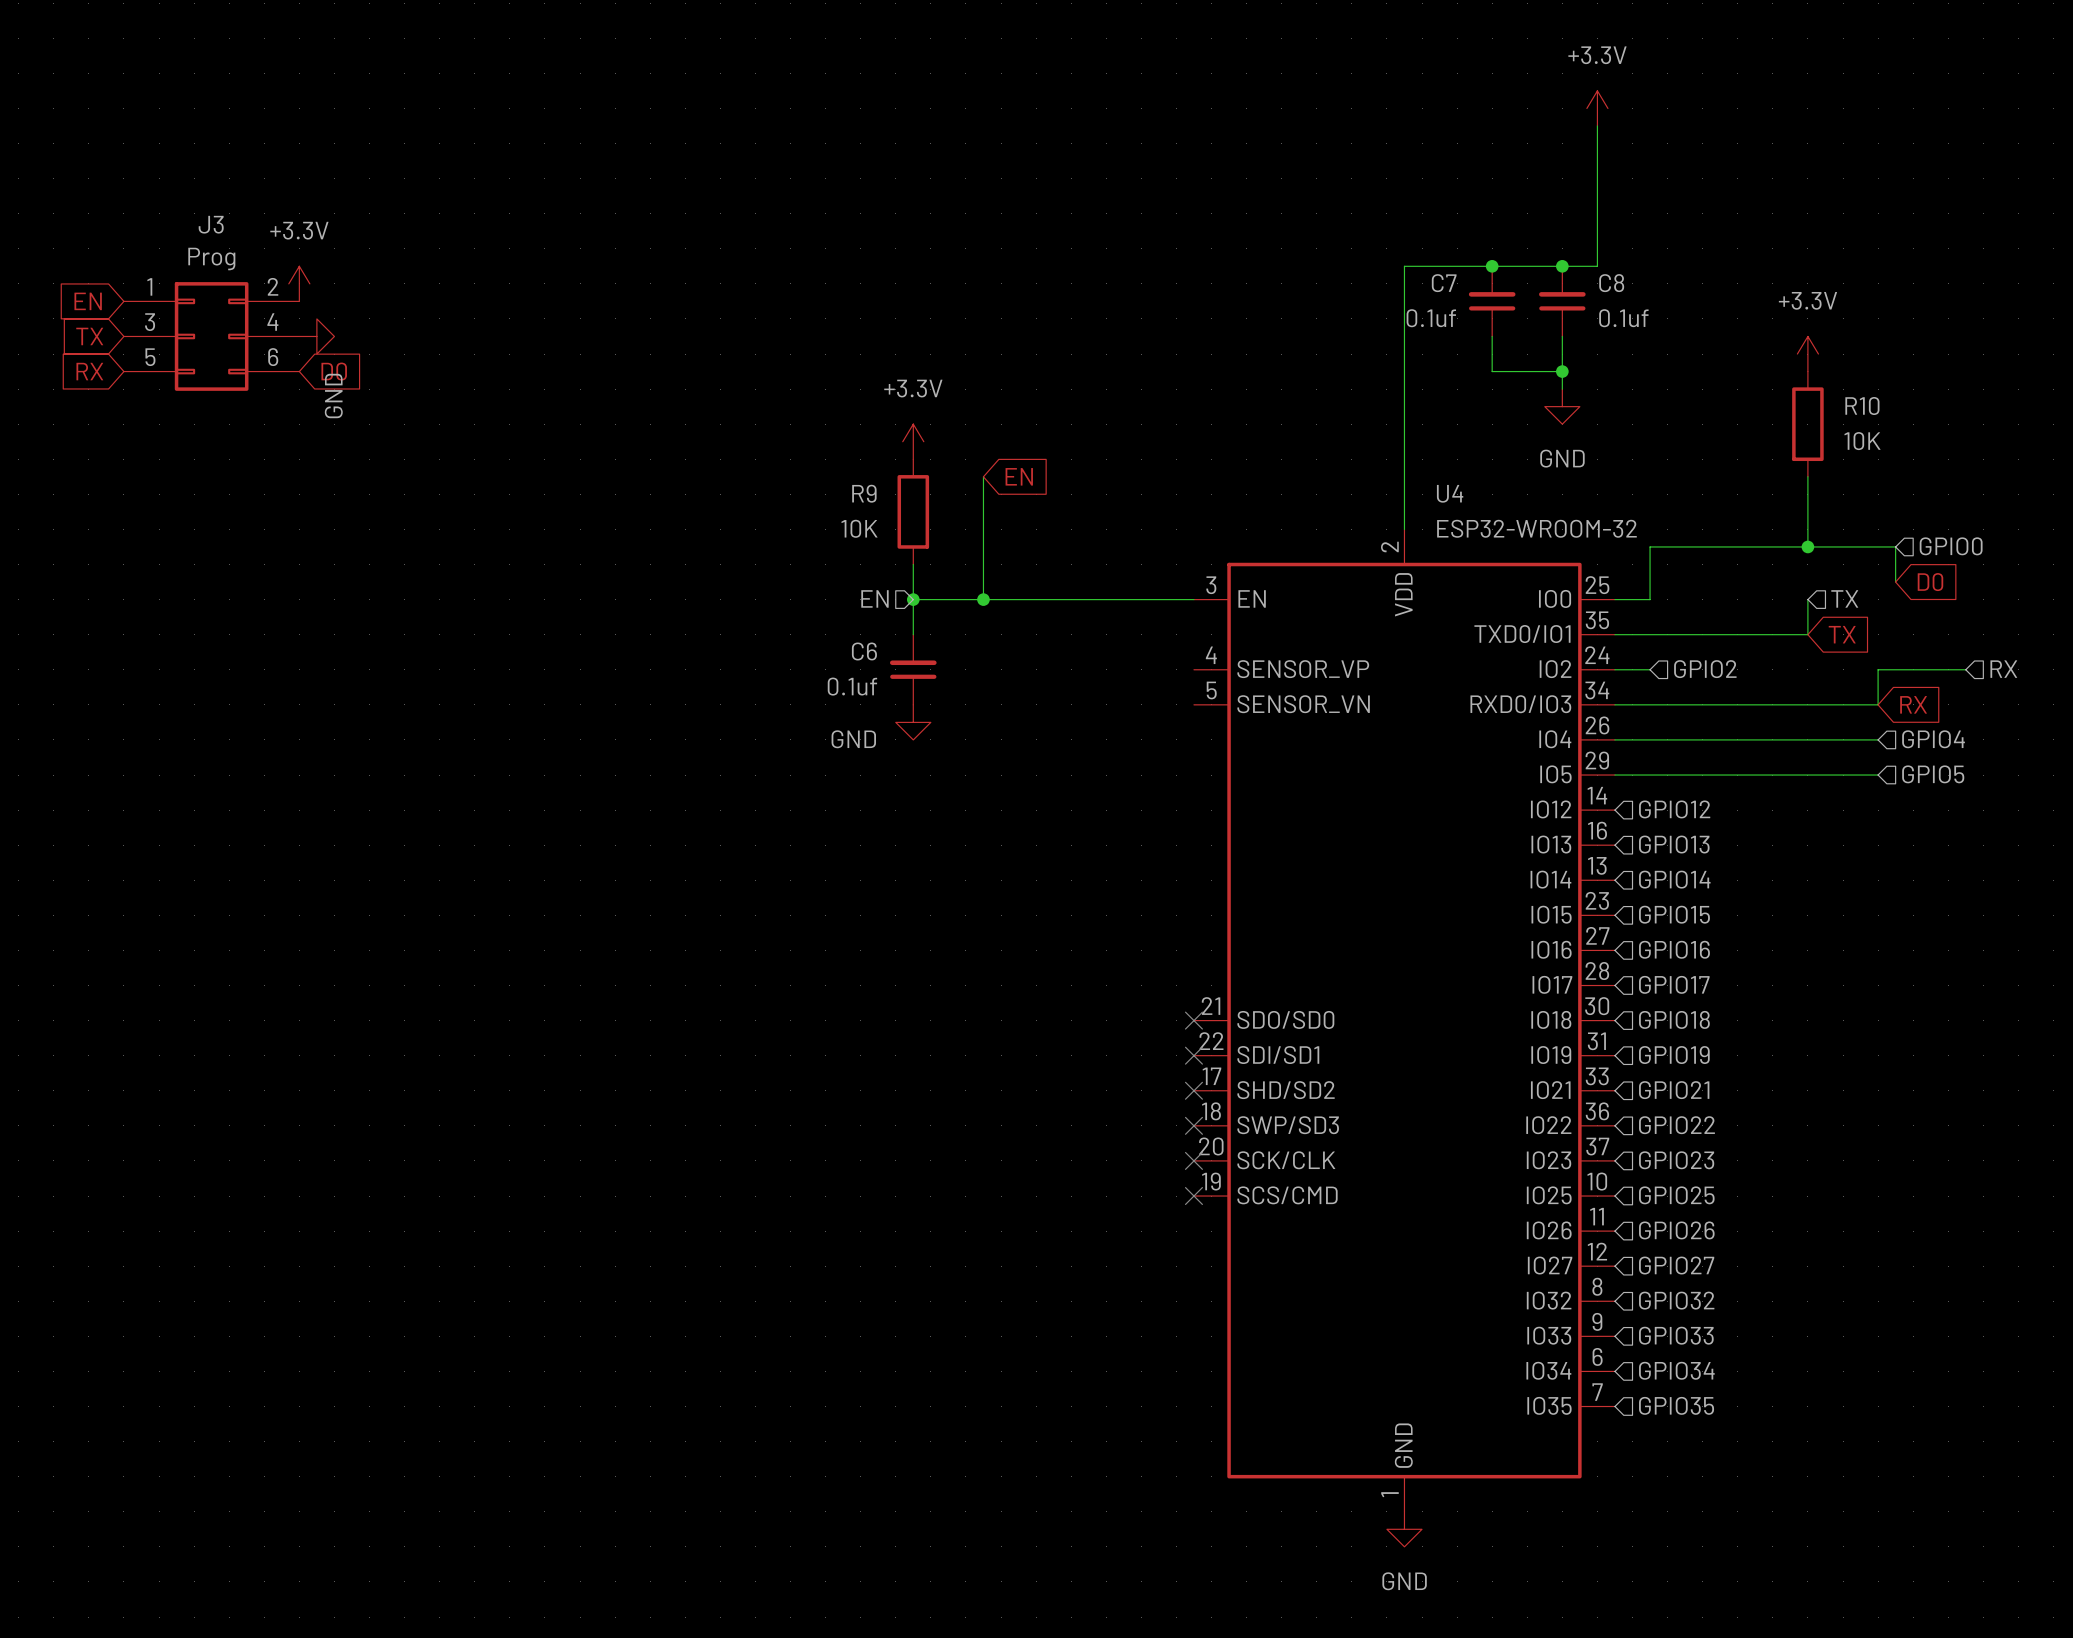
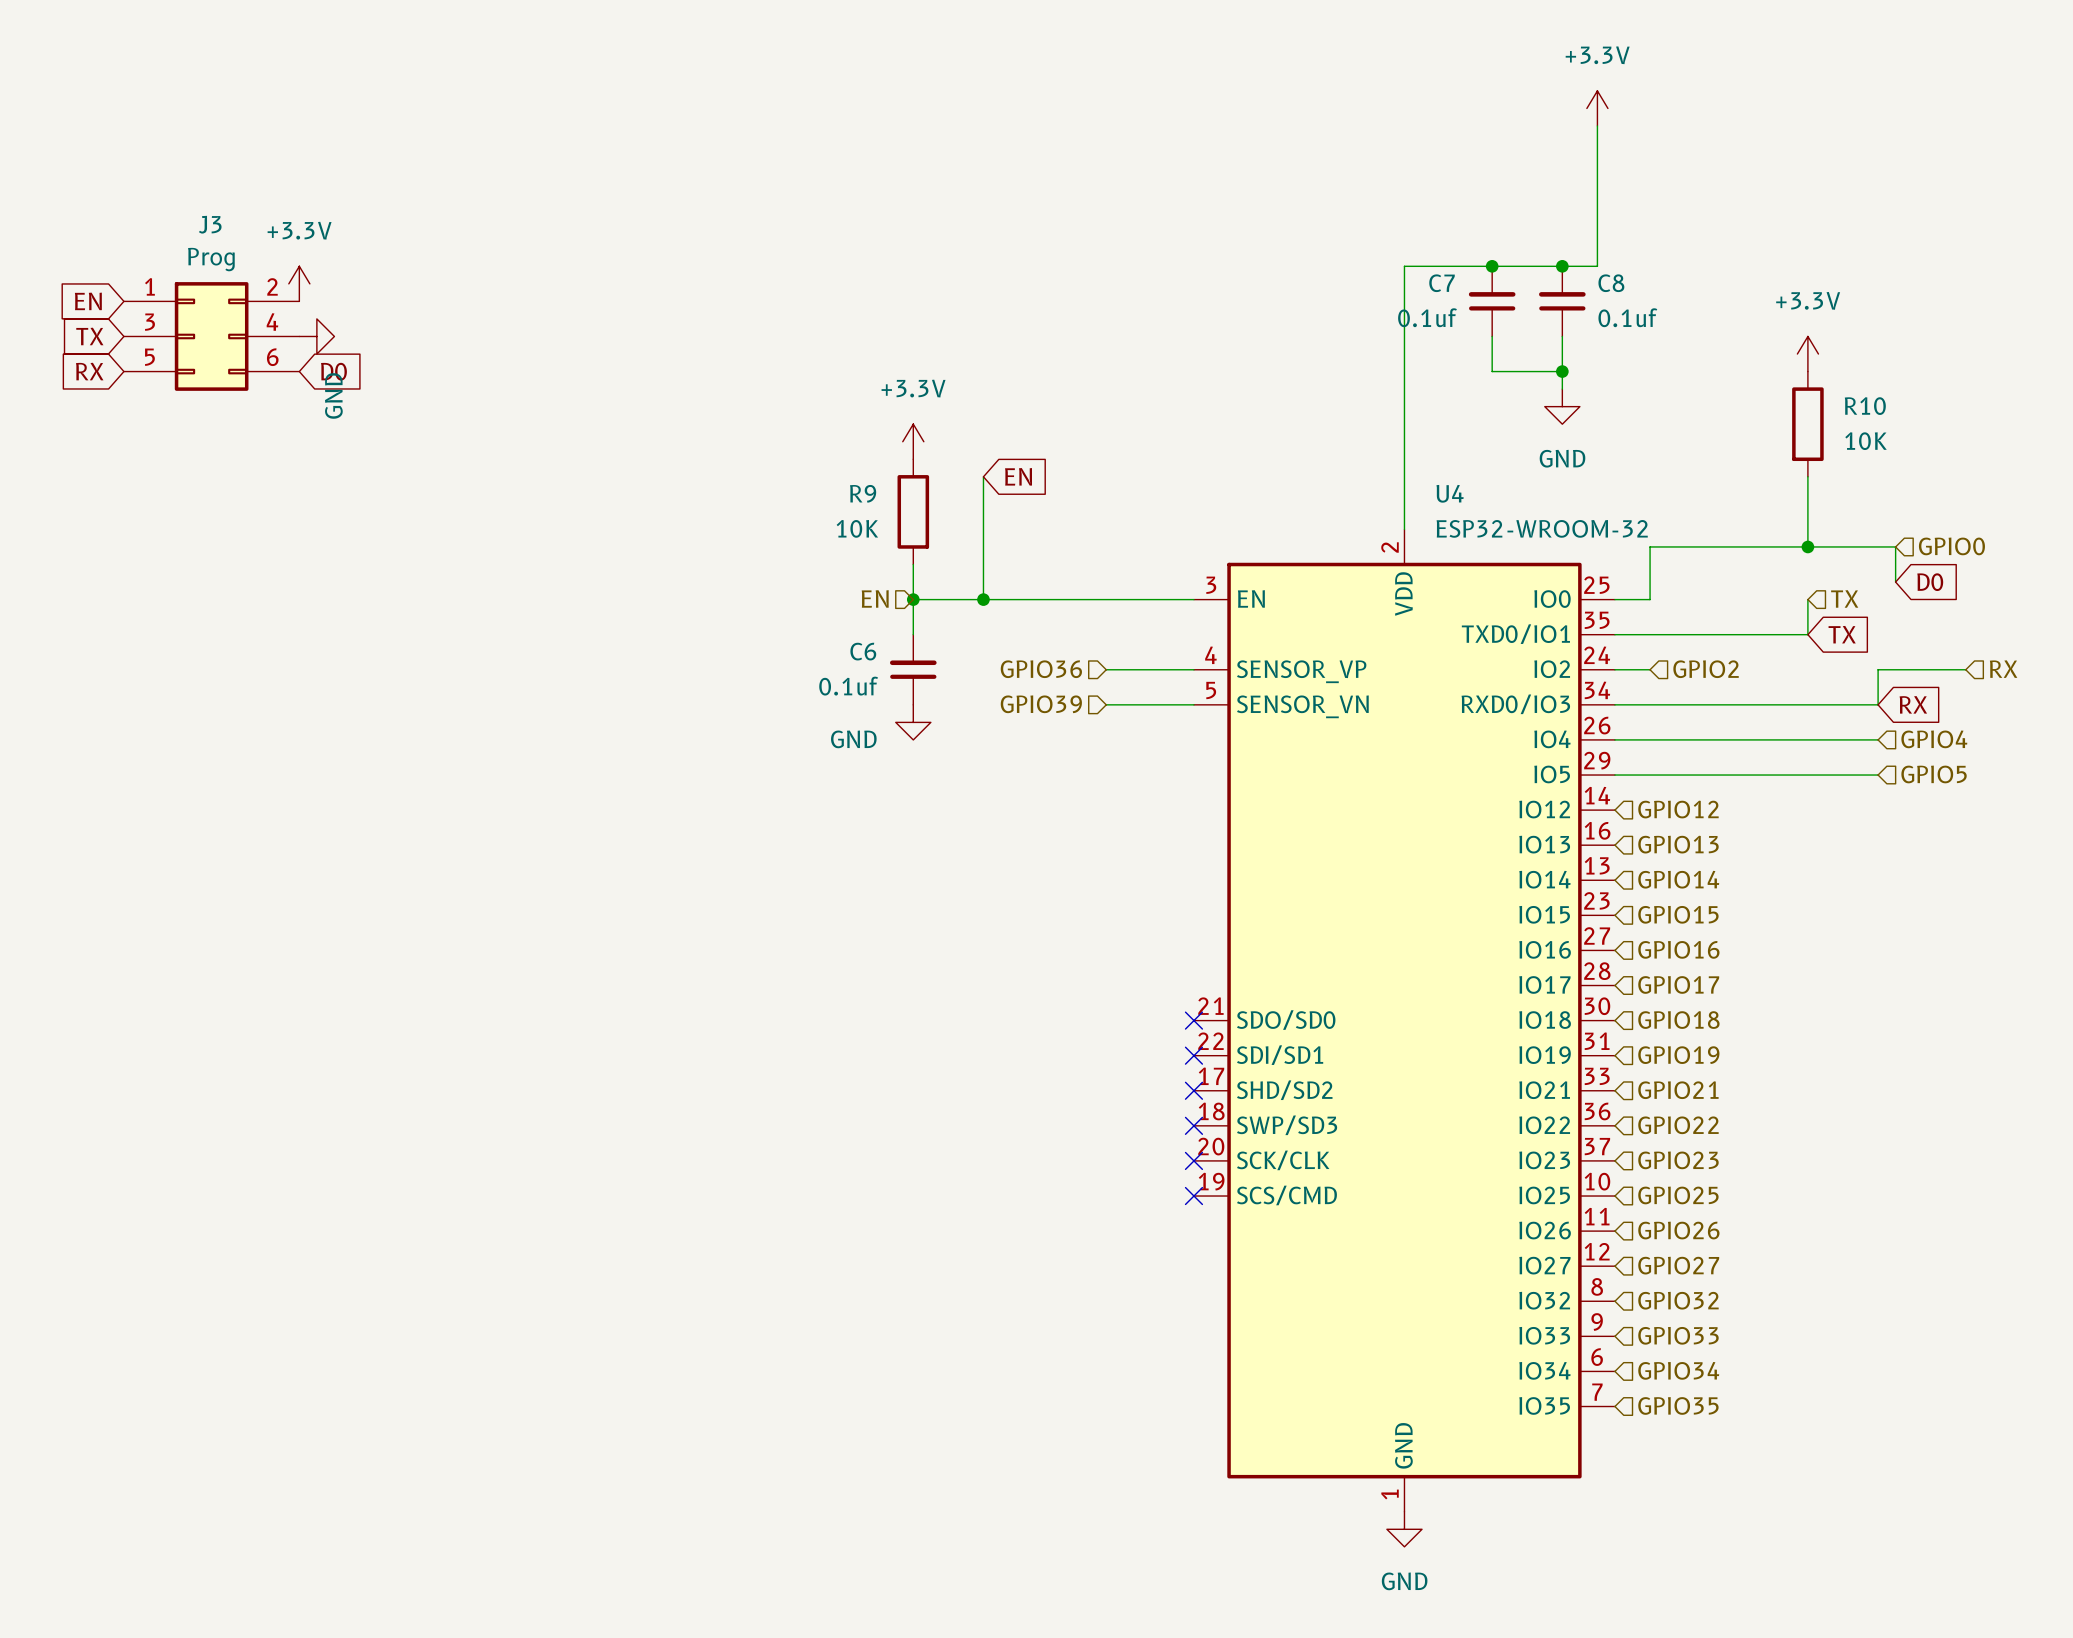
hierarchical label: none -> GPIO36 (1041, 669)
wire: none -> (1106, 669) (1193, 669)
hierarchical label: none -> GPIO39 (1041, 704)
wire: none -> (1106, 704) (1193, 704)

